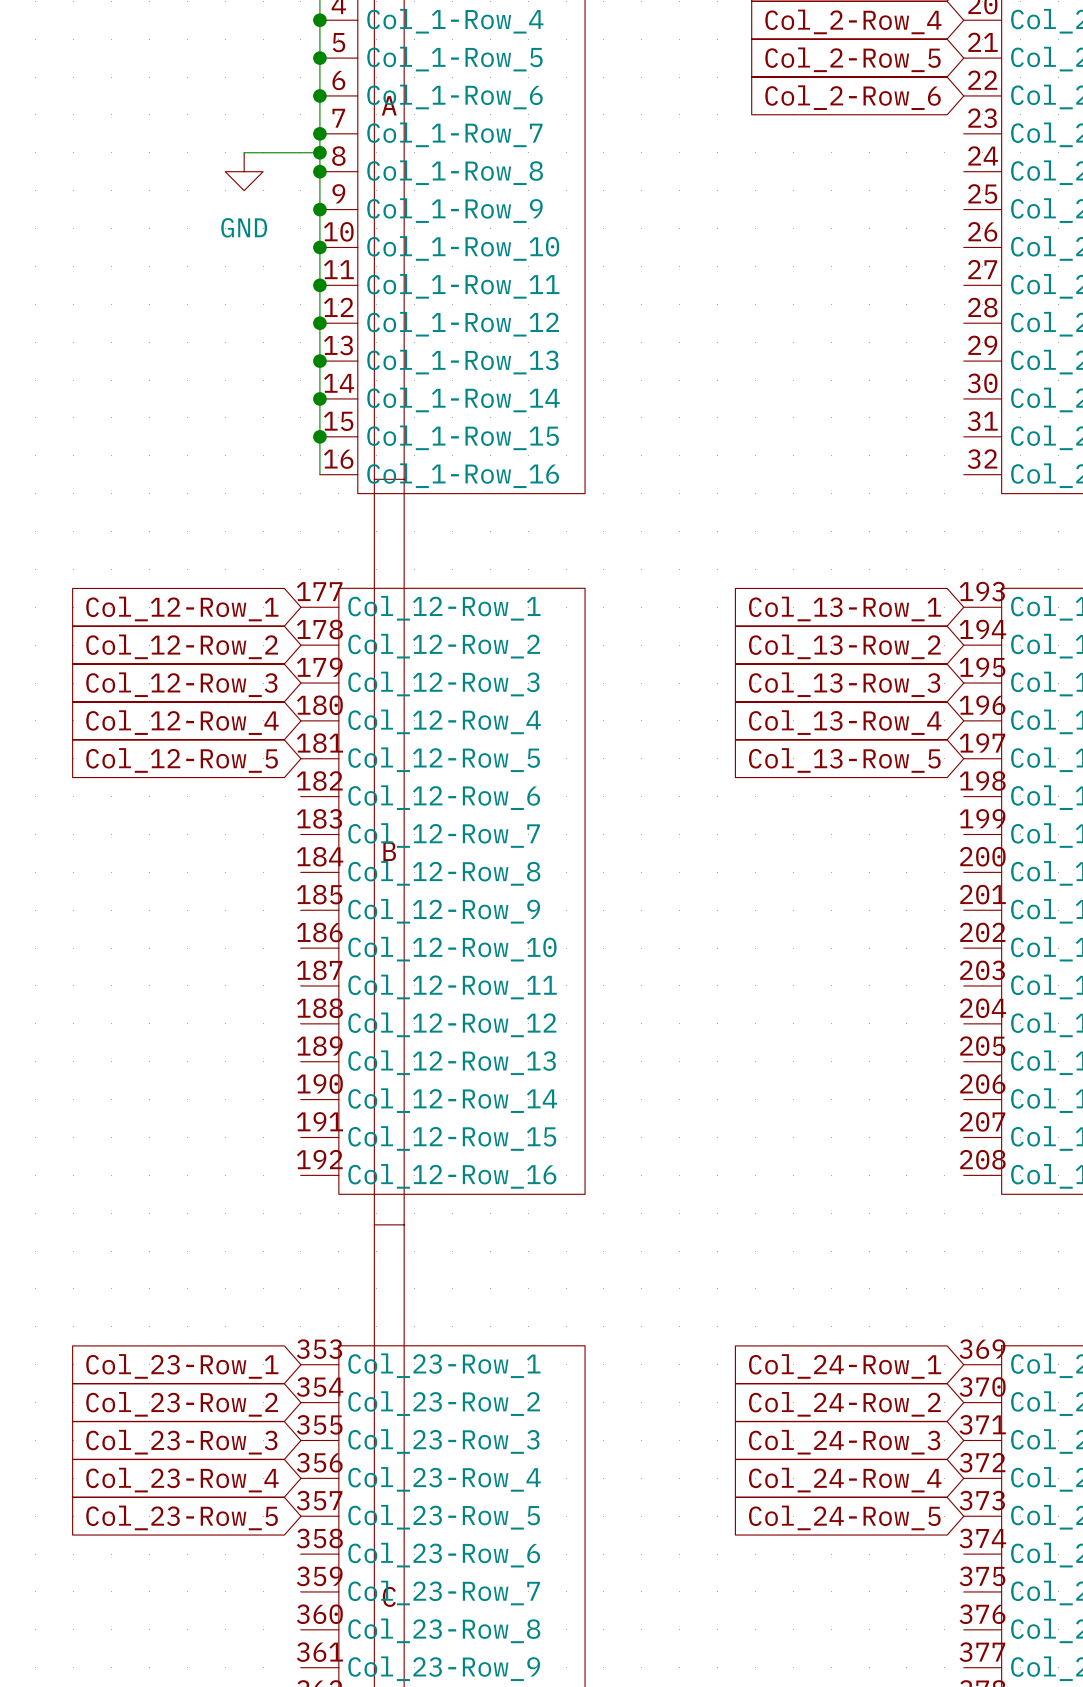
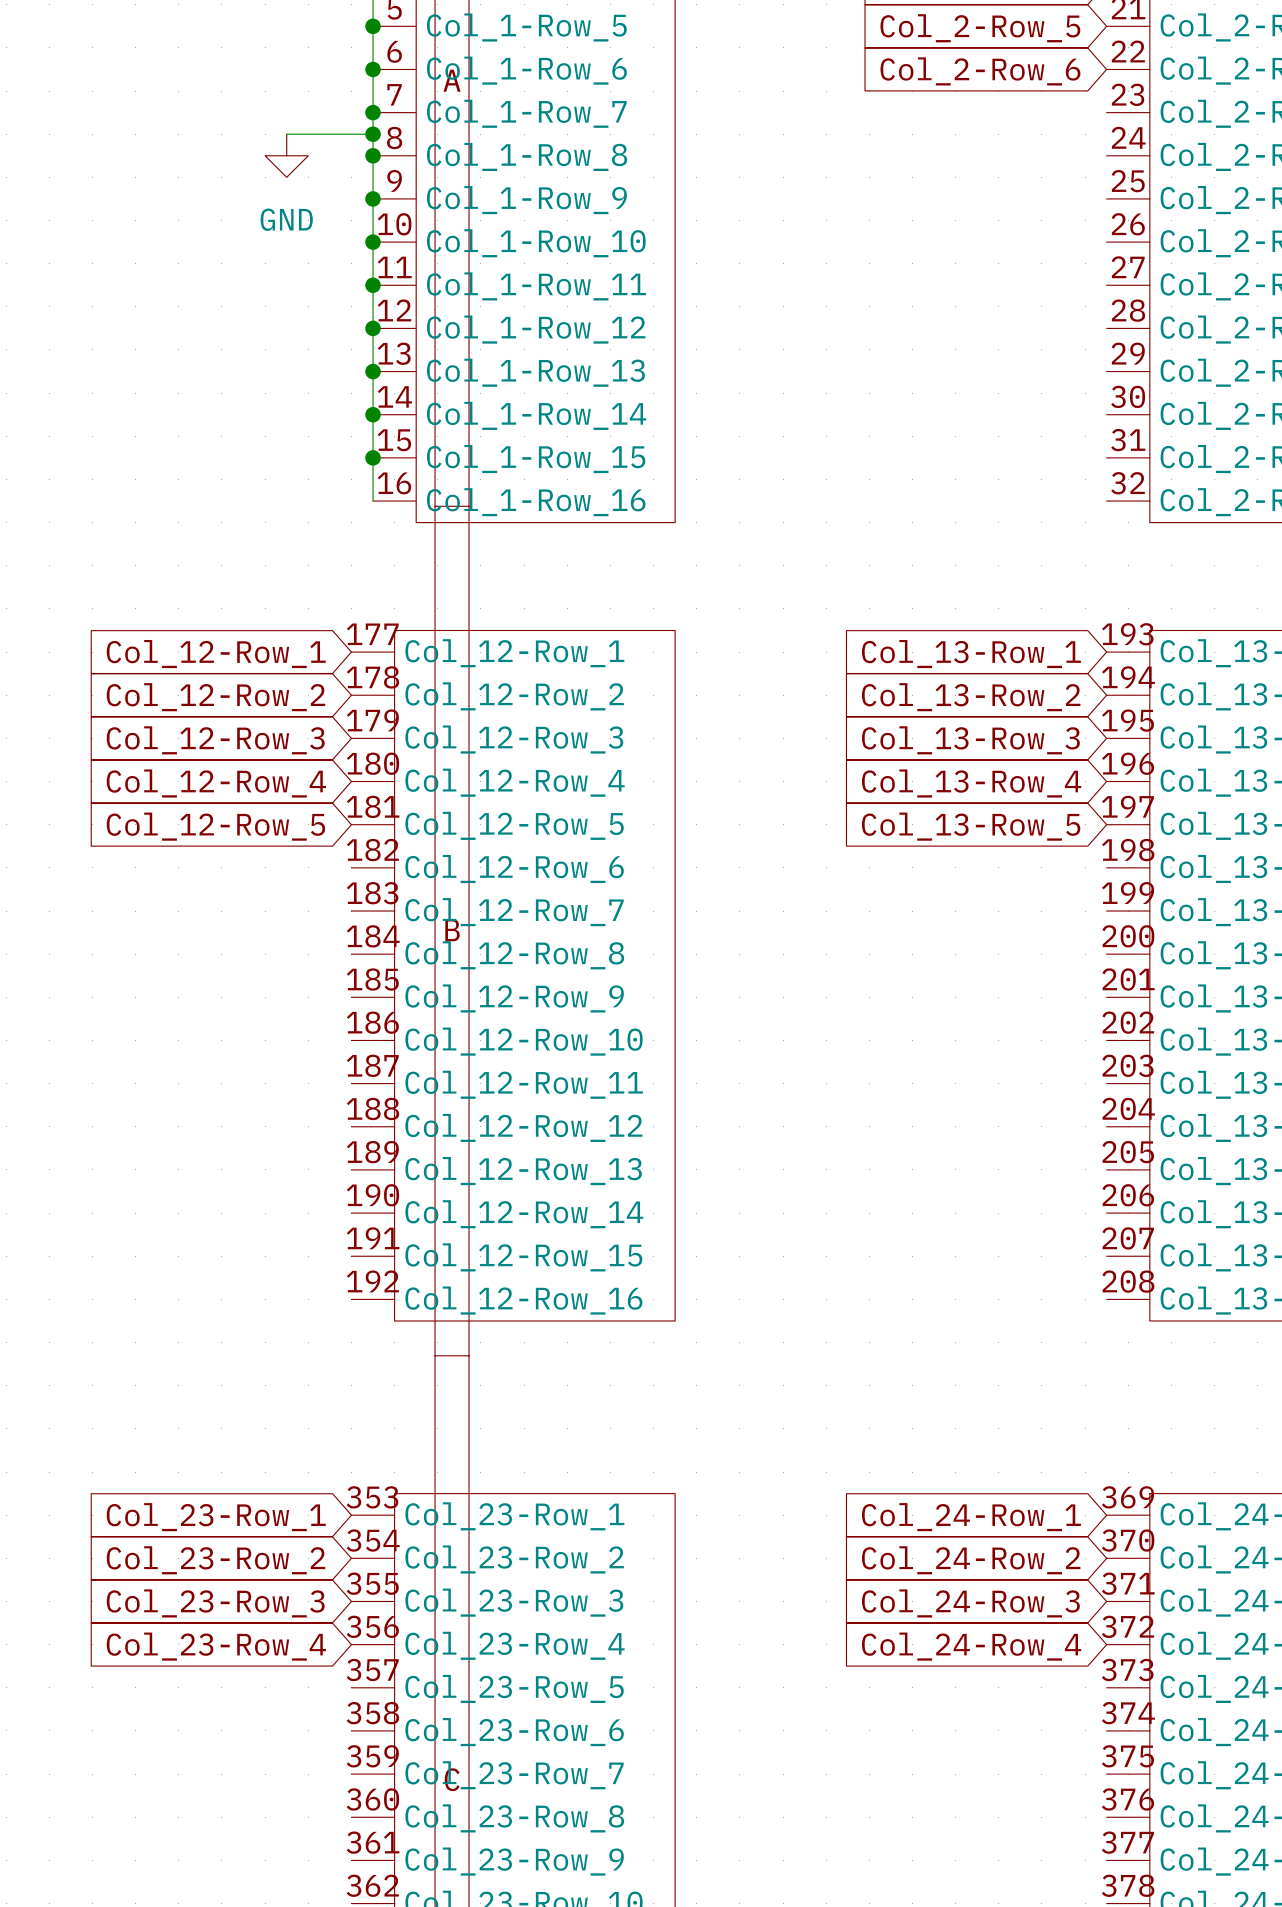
global label: Col_23-Row_5 (182, 1517) -> none
global label: Col_24-Row_5 (844, 1517) -> none

